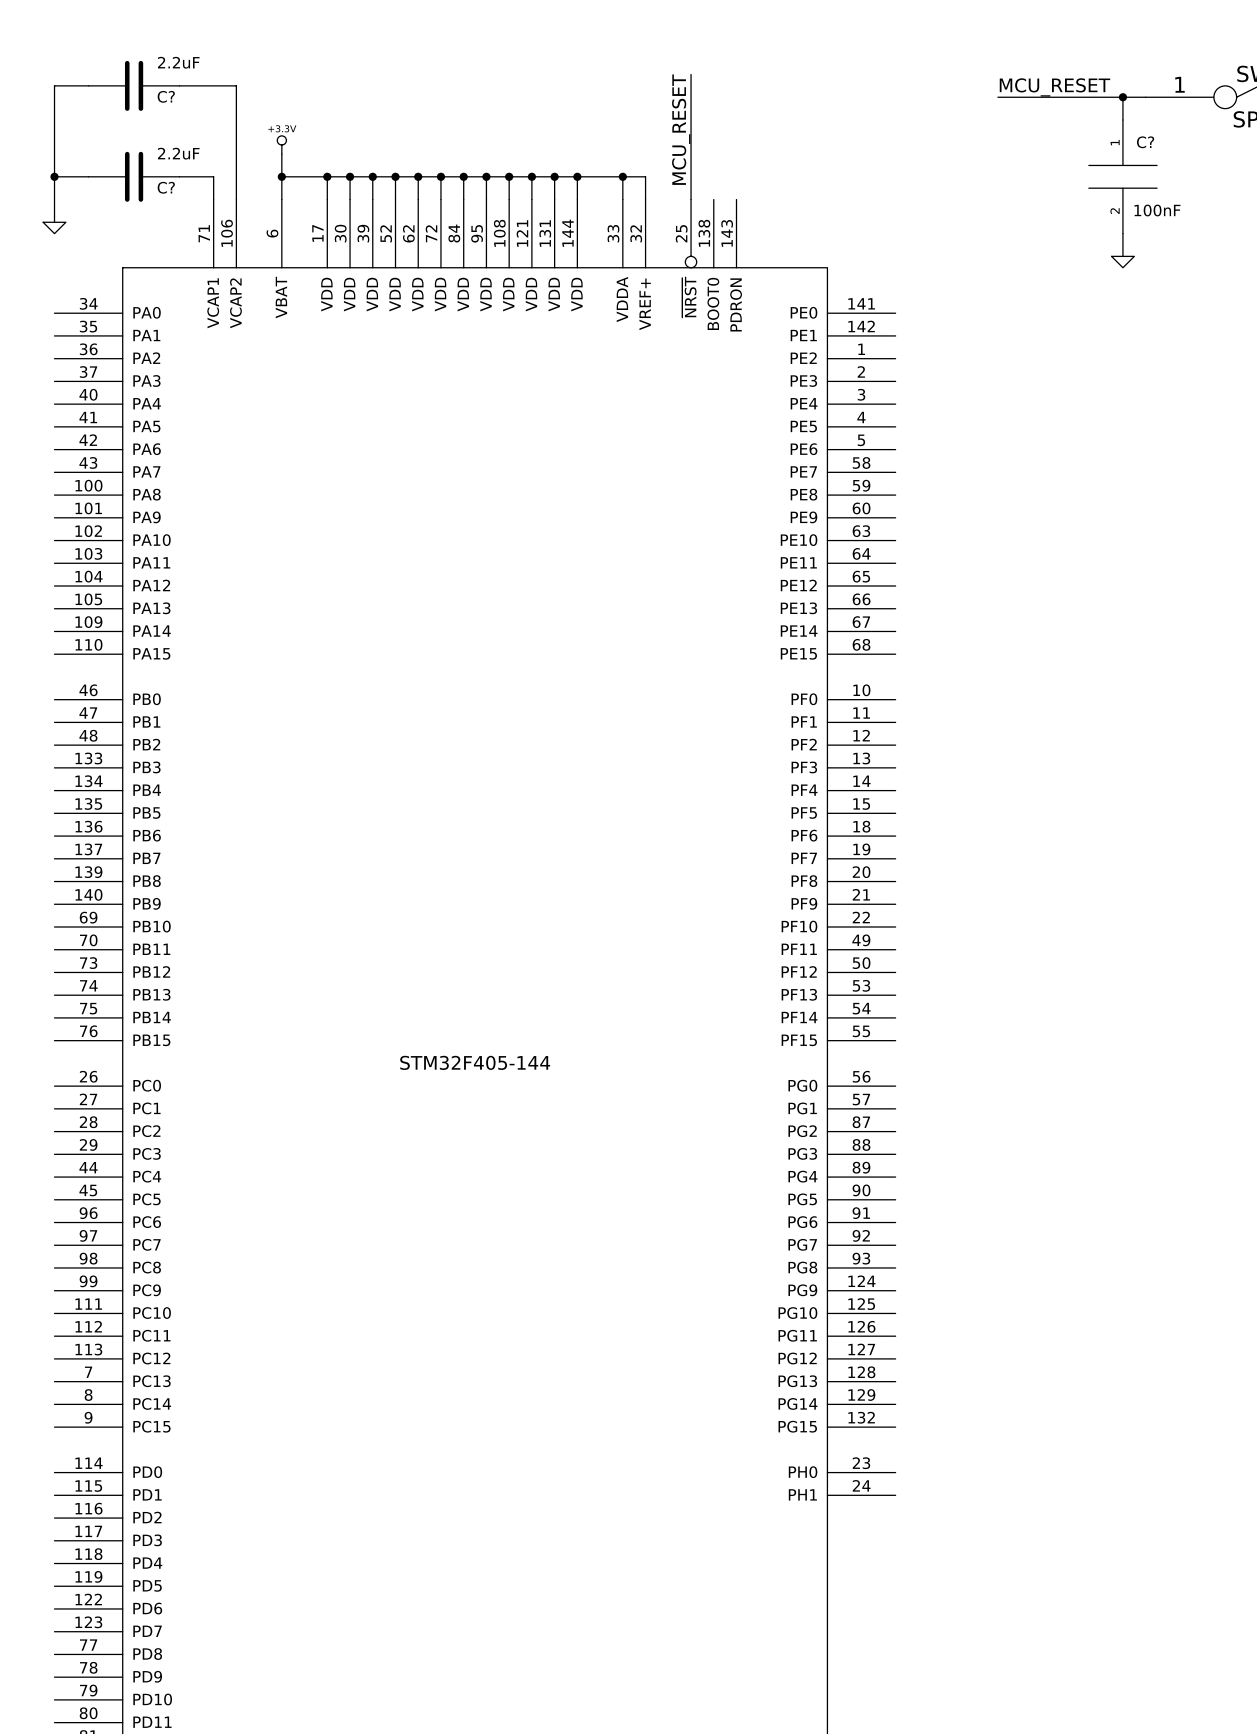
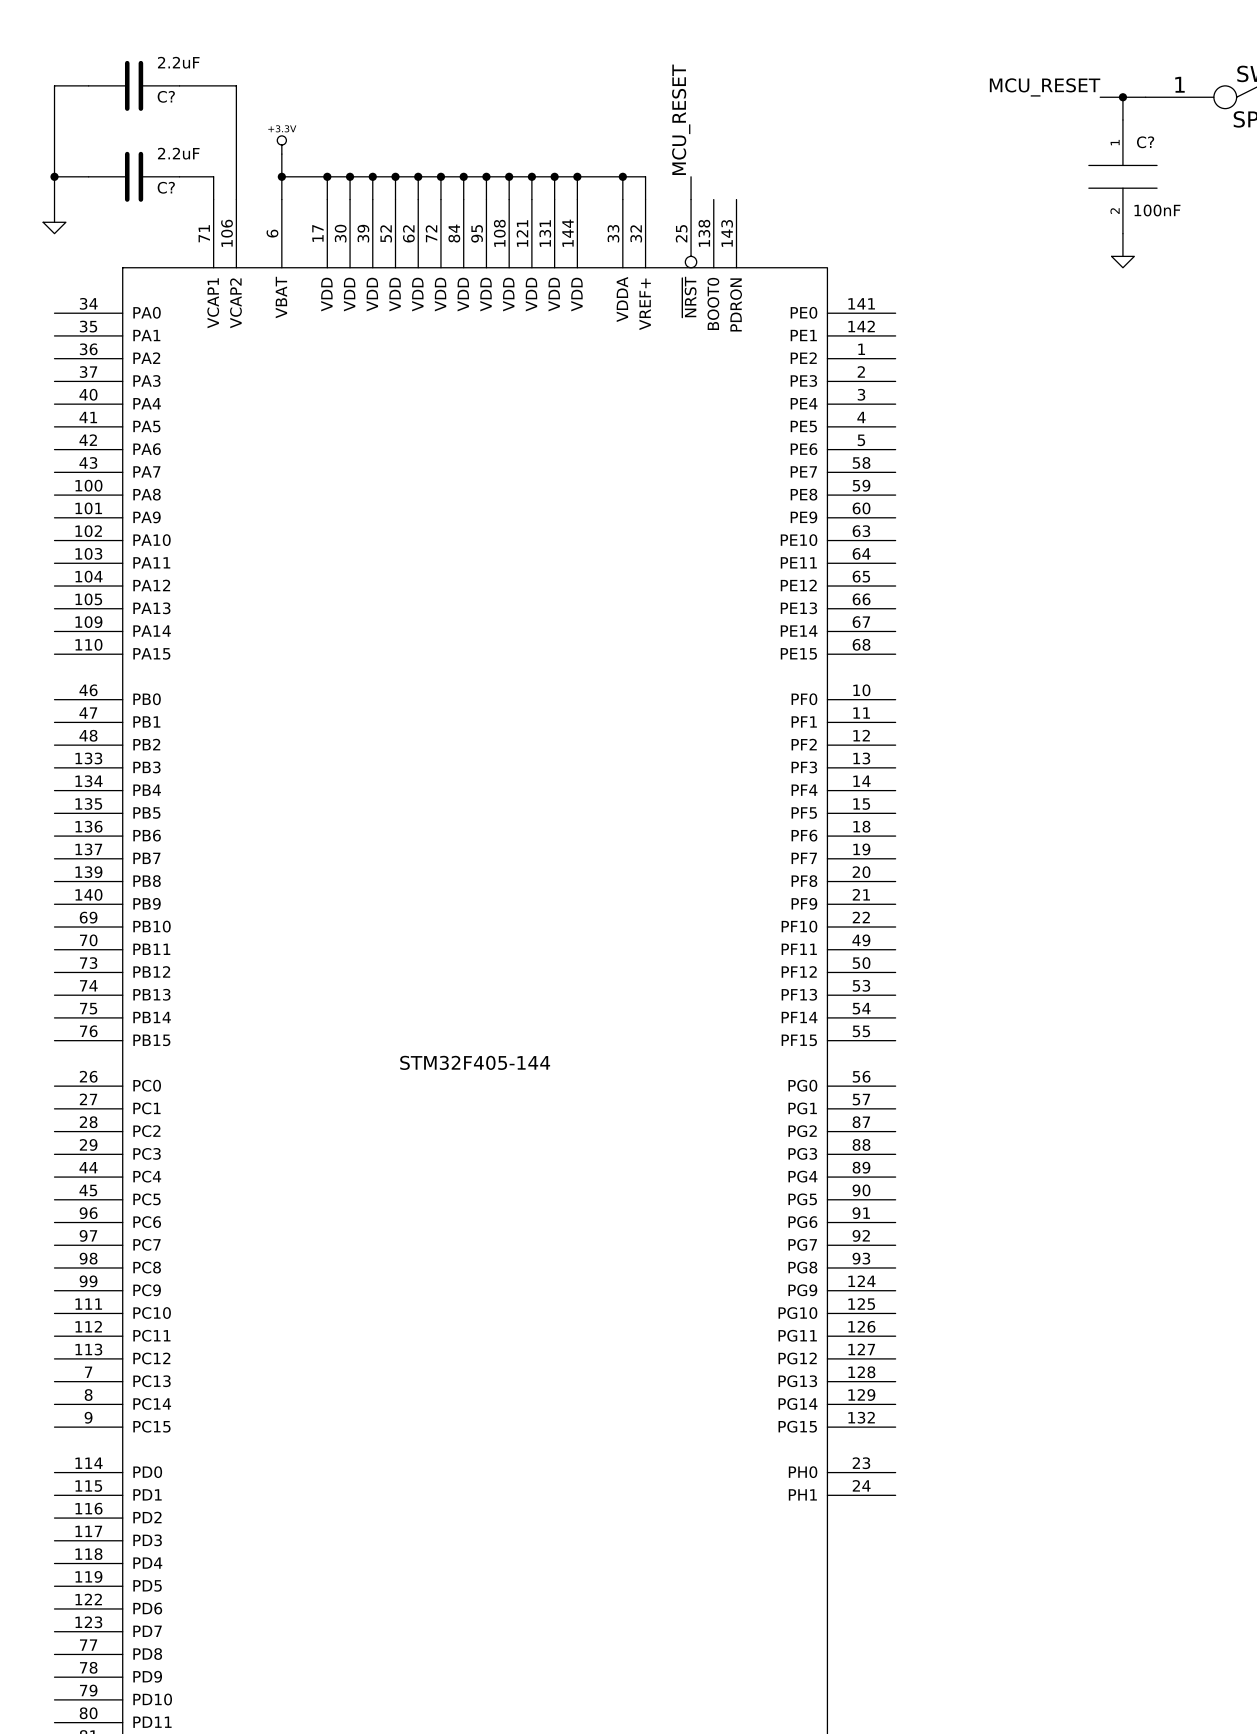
wire: (691, 74) (691, 176) -> none
label position: MCU_RESET (1054, 87) -> MCU_RESET (1045, 87)
wire: (997, 97) (1100, 97) -> none
label position: MCU_RESET (681, 129) -> MCU_RESET (681, 119)

